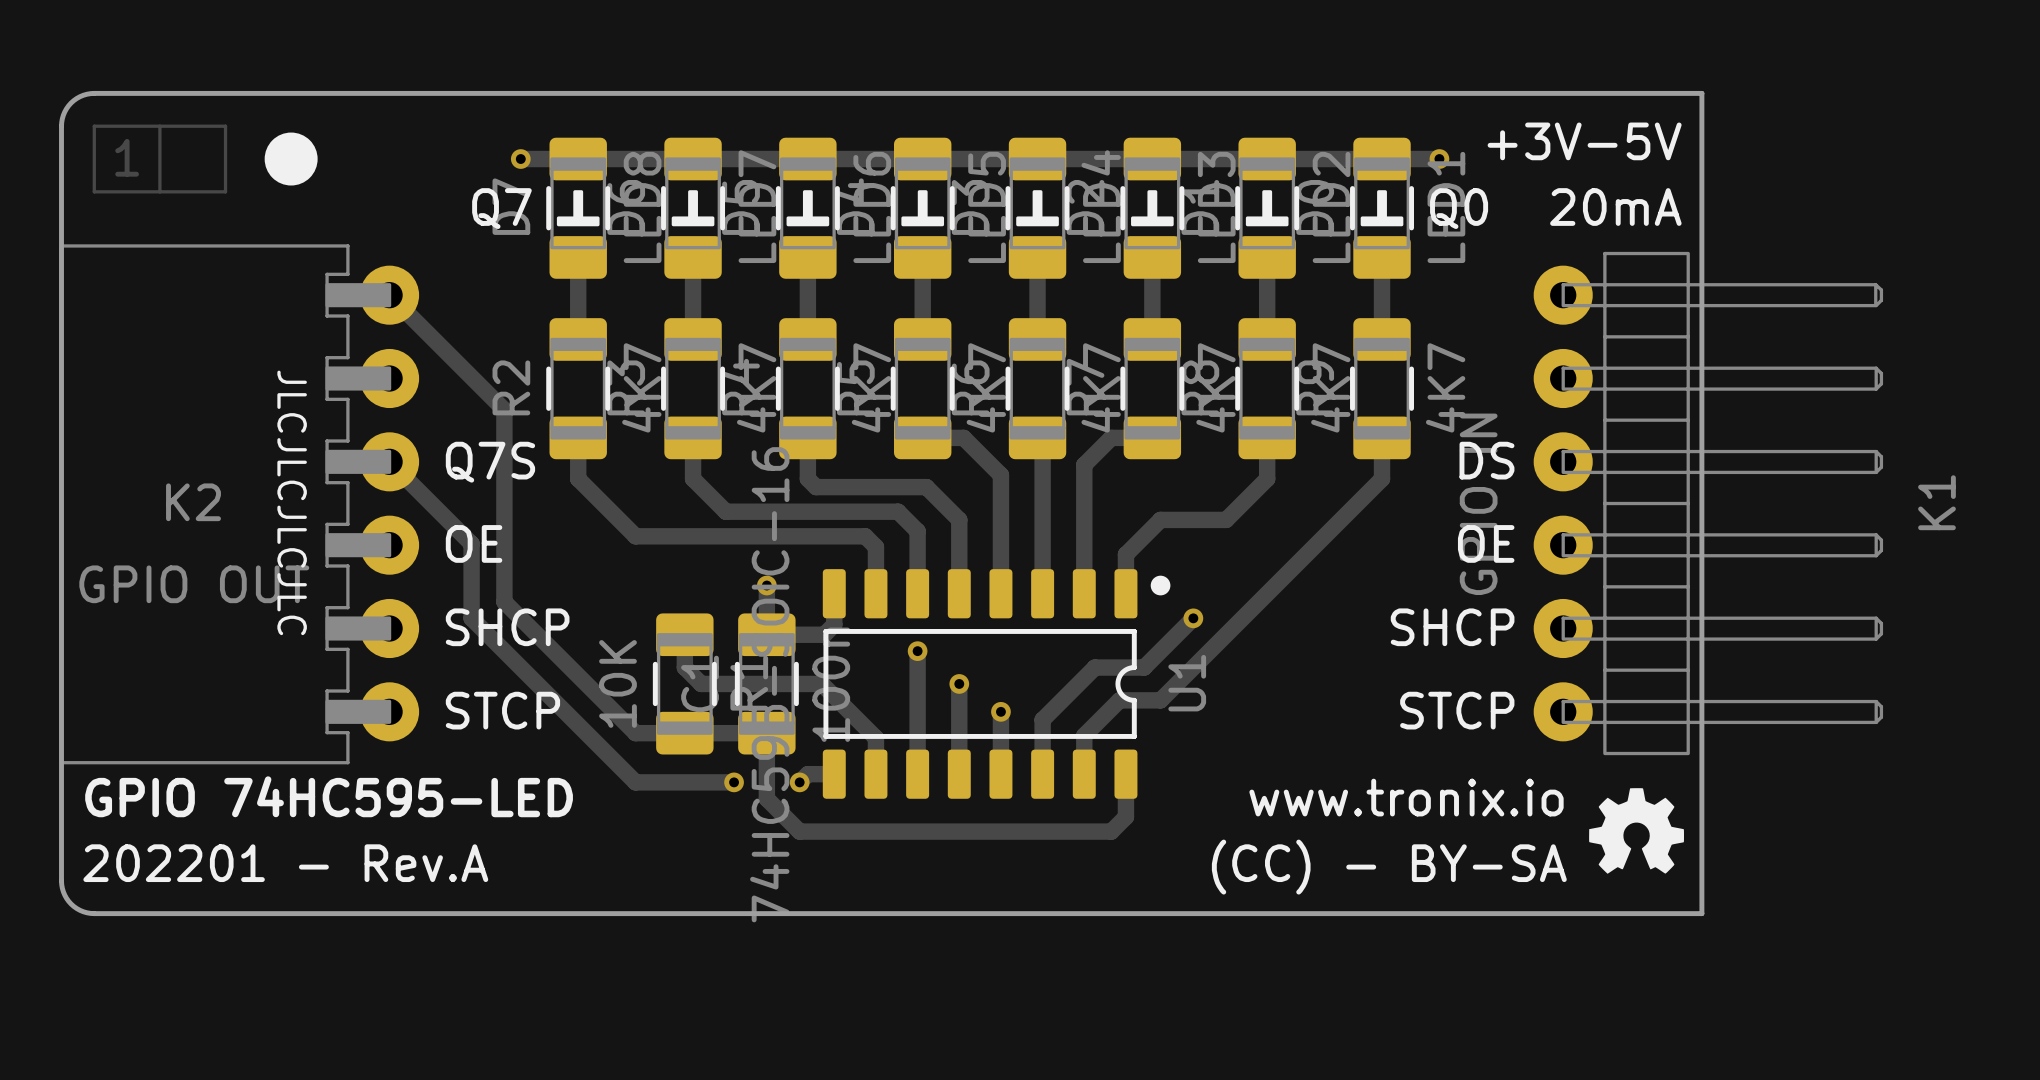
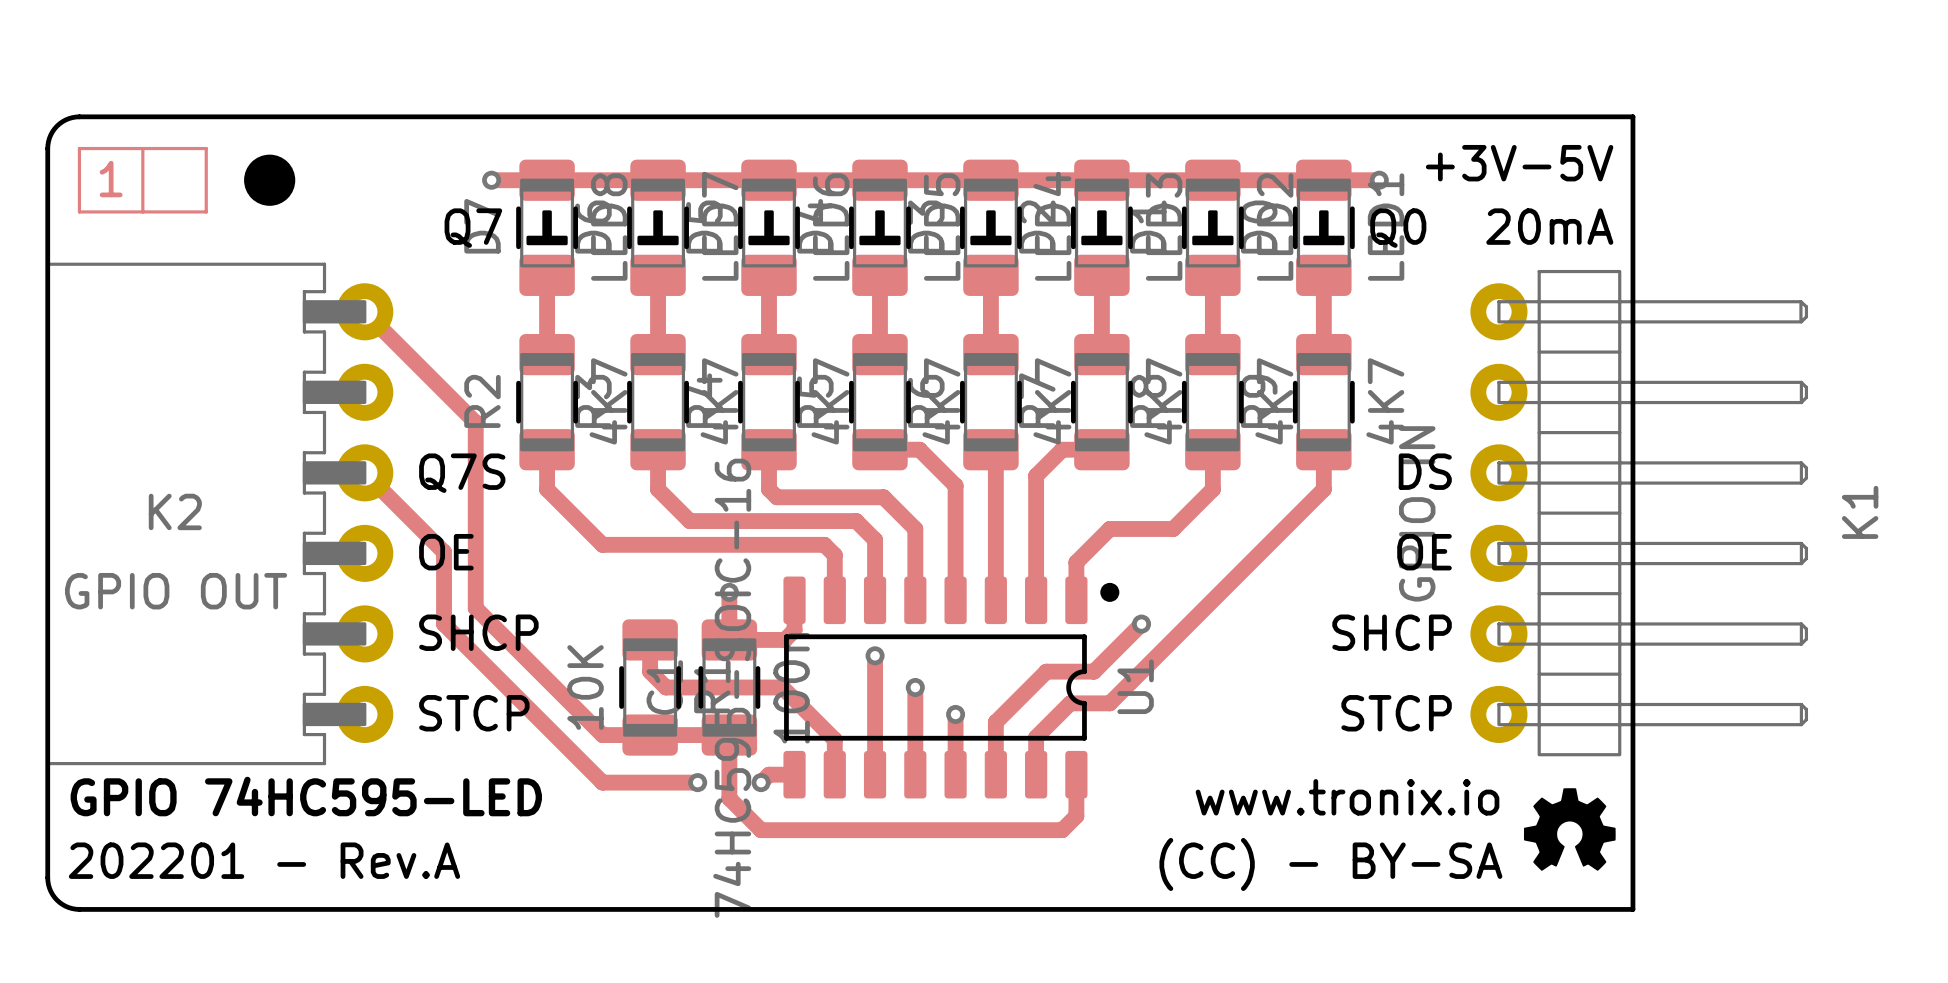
text: JLCJLCJLCJLC (292, 502) -> none

